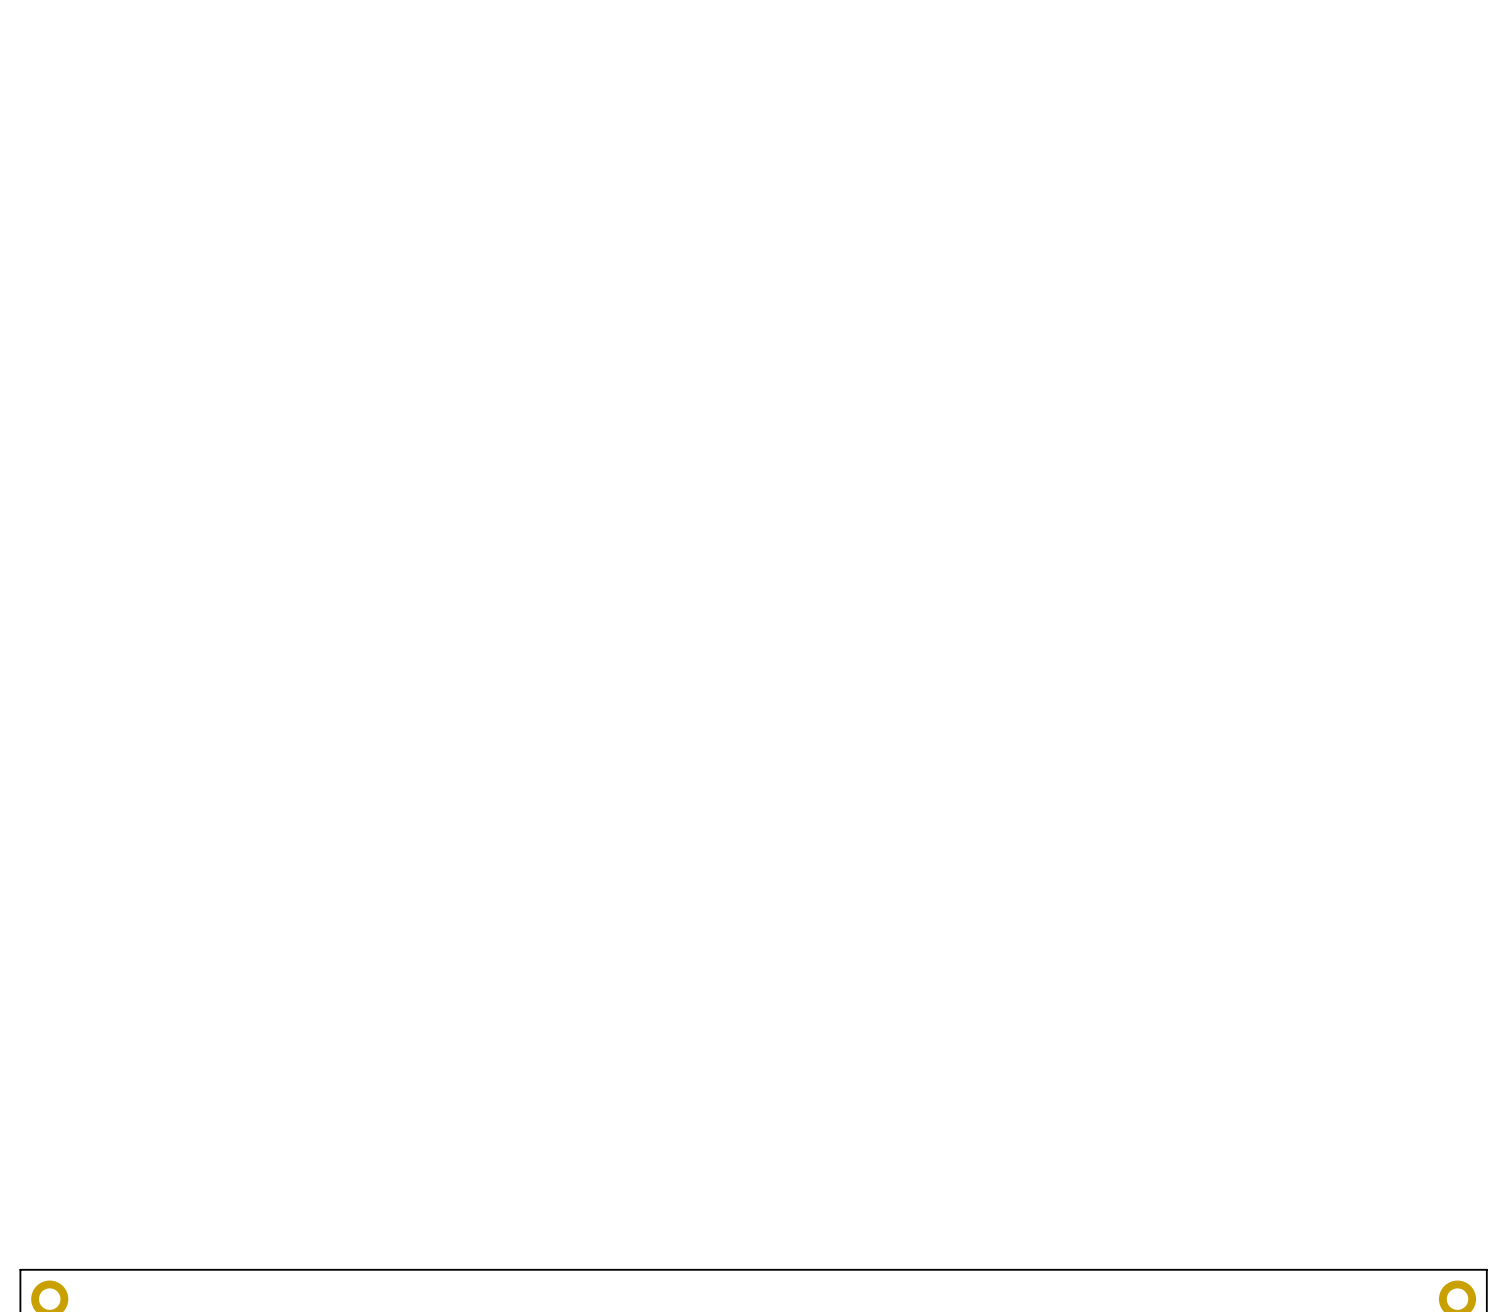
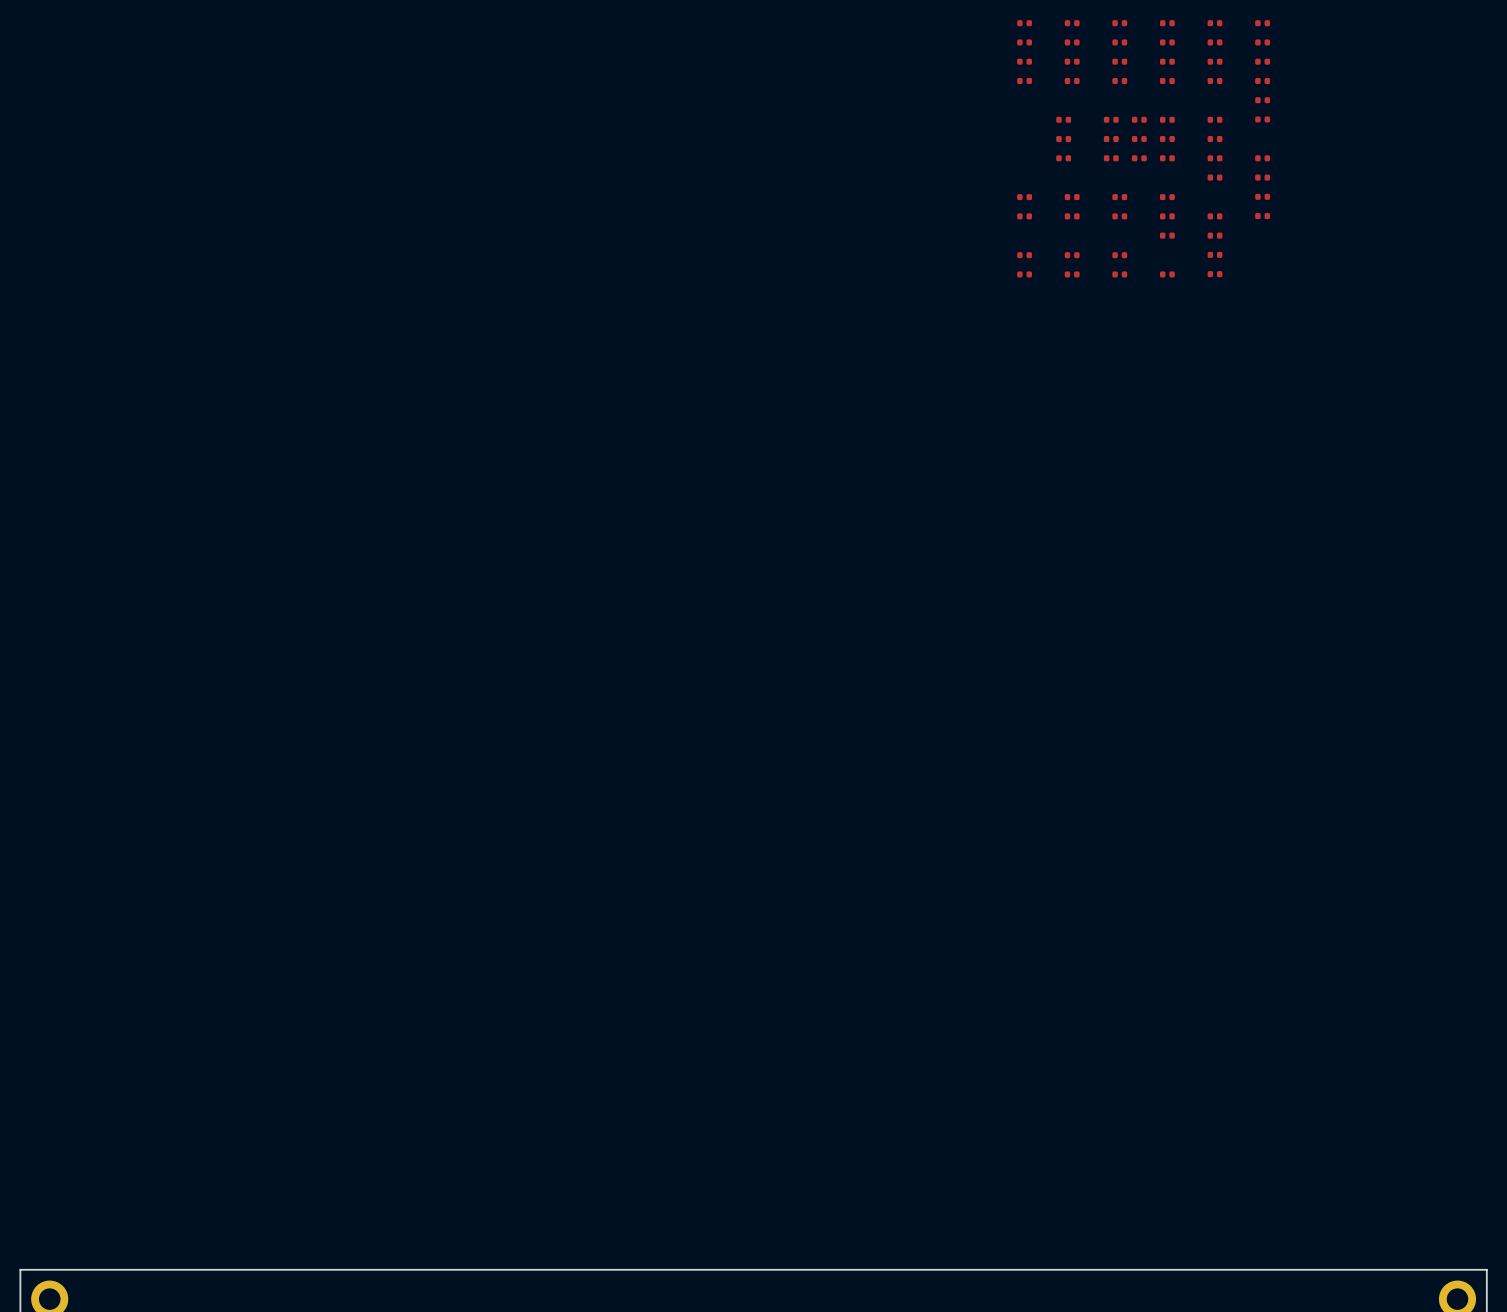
part: none -> (1024, 23)
part: none -> (1072, 23)
part: none -> (1119, 23)
part: none -> (1167, 23)
part: none -> (1215, 23)
part: none -> (1262, 23)
part: none -> (1024, 42)
part: none -> (1072, 42)
part: none -> (1119, 42)
part: none -> (1167, 42)
part: none -> (1215, 42)
part: none -> (1262, 42)
part: none -> (1024, 61)
part: none -> (1072, 61)
part: none -> (1119, 61)
part: none -> (1167, 61)
part: none -> (1215, 61)
part: none -> (1262, 61)
part: none -> (1024, 80)
part: none -> (1072, 80)
part: none -> (1119, 80)
part: none -> (1167, 80)
part: none -> (1215, 80)
part: none -> (1262, 80)
part: none -> (1262, 100)
part: none -> (1063, 119)
part: none -> (1111, 119)
part: none -> (1139, 119)
part: none -> (1167, 119)
part: none -> (1215, 119)
part: none -> (1262, 119)
part: none -> (1063, 139)
part: none -> (1111, 139)
part: none -> (1139, 139)
part: none -> (1167, 139)
part: none -> (1215, 139)
part: none -> (1063, 158)
part: none -> (1111, 158)
part: none -> (1139, 158)
part: none -> (1167, 158)
part: none -> (1215, 158)
part: none -> (1262, 158)
part: none -> (1215, 177)
part: none -> (1262, 177)
part: none -> (1262, 196)
part: none -> (1024, 197)
part: none -> (1072, 197)
part: none -> (1119, 197)
part: none -> (1167, 197)
part: none -> (1024, 216)
part: none -> (1072, 216)
part: none -> (1119, 216)
part: none -> (1167, 216)
part: none -> (1215, 216)
part: none -> (1262, 216)
part: none -> (1167, 235)
part: none -> (1215, 235)
part: none -> (1215, 254)
part: none -> (1024, 255)
part: none -> (1072, 255)
part: none -> (1119, 255)
part: none -> (1024, 274)
part: none -> (1072, 274)
part: none -> (1119, 274)
part: none -> (1167, 274)
part: none -> (1215, 274)

